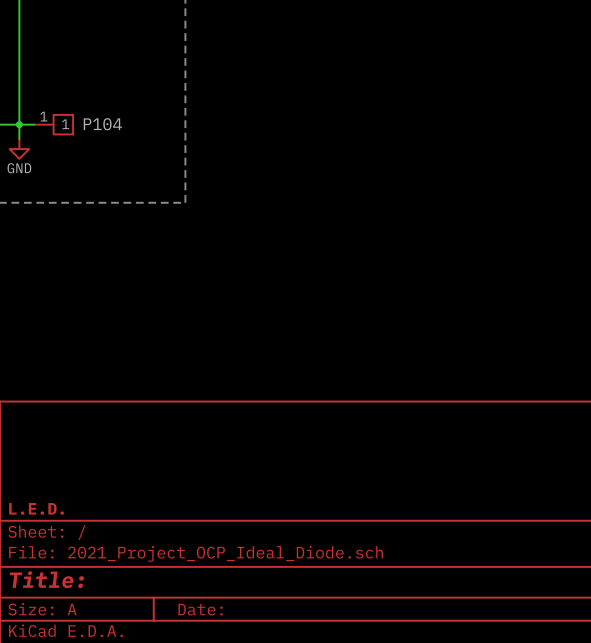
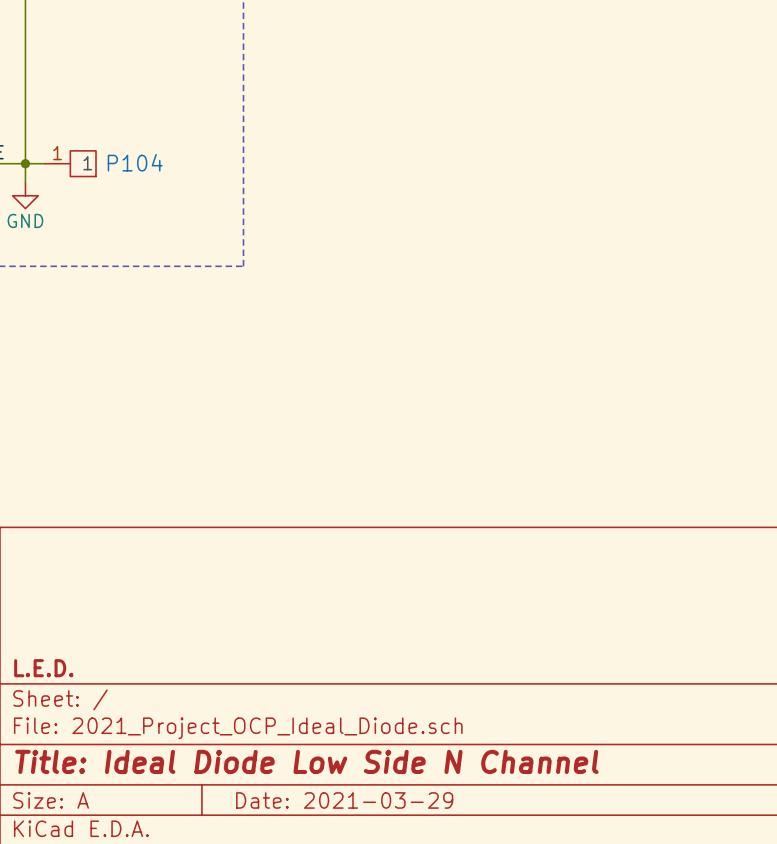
title block: Title: (46, 579) -> Title: Ideal Diode Low Side N Channel (306, 761)
title block: Date: (200, 609) -> Date: 2021-03-29 (344, 800)

